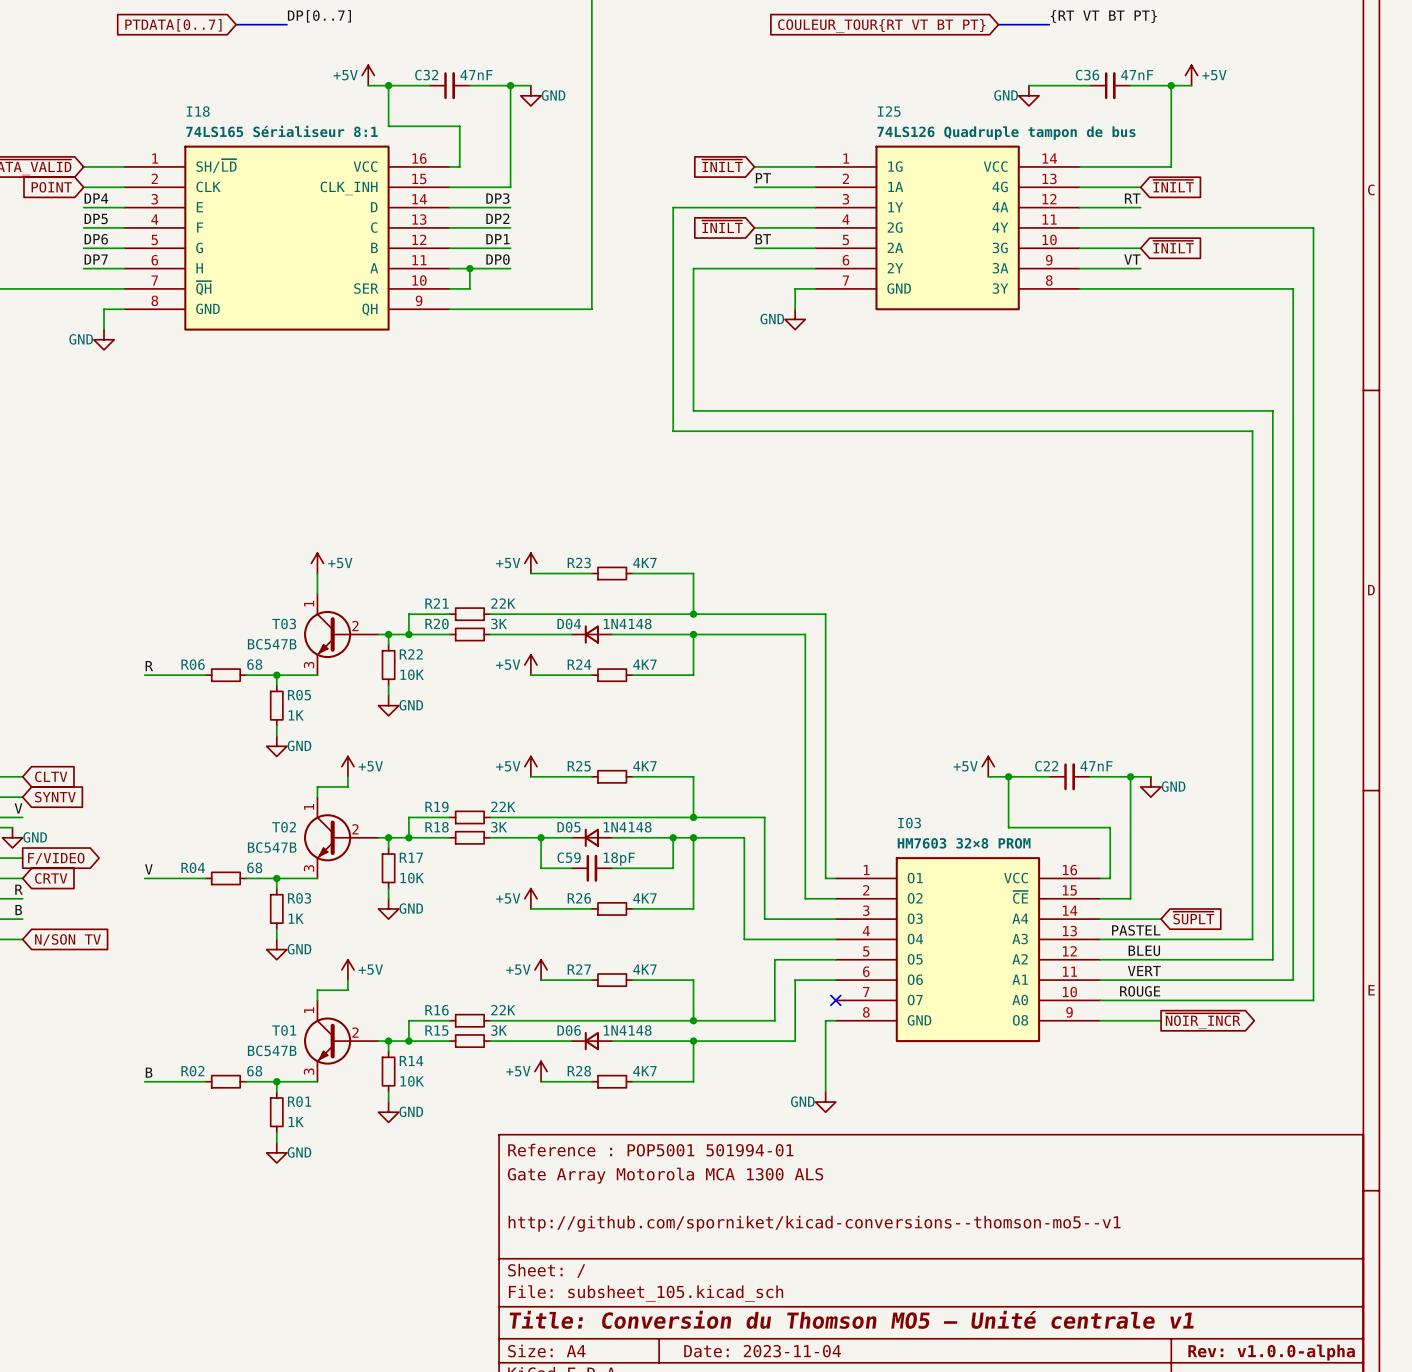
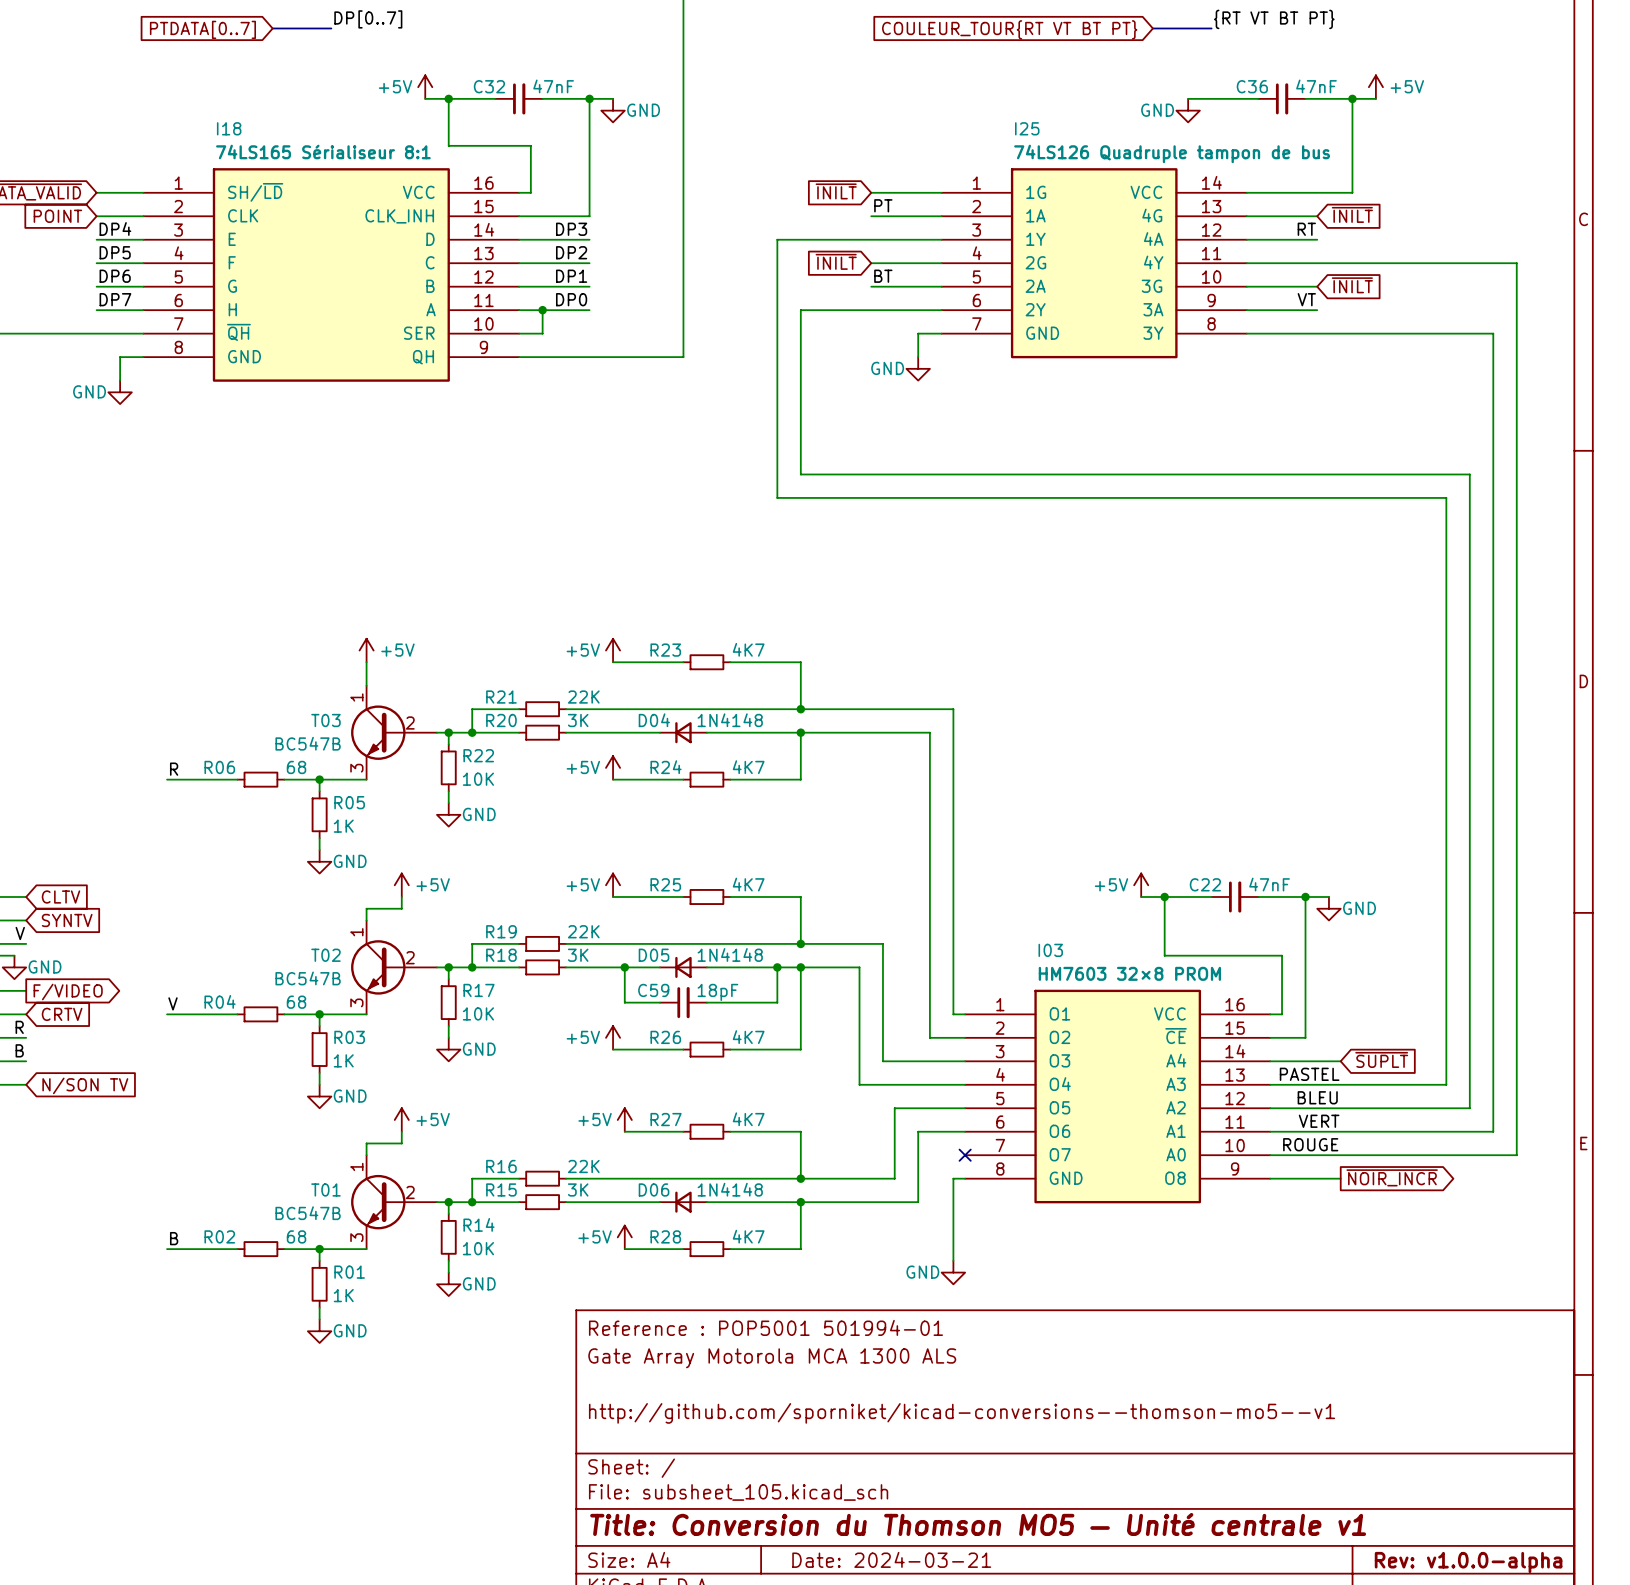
title block: Date: 2023-11-04 (762, 1351) -> Date: 2024-03-21 (891, 1559)

